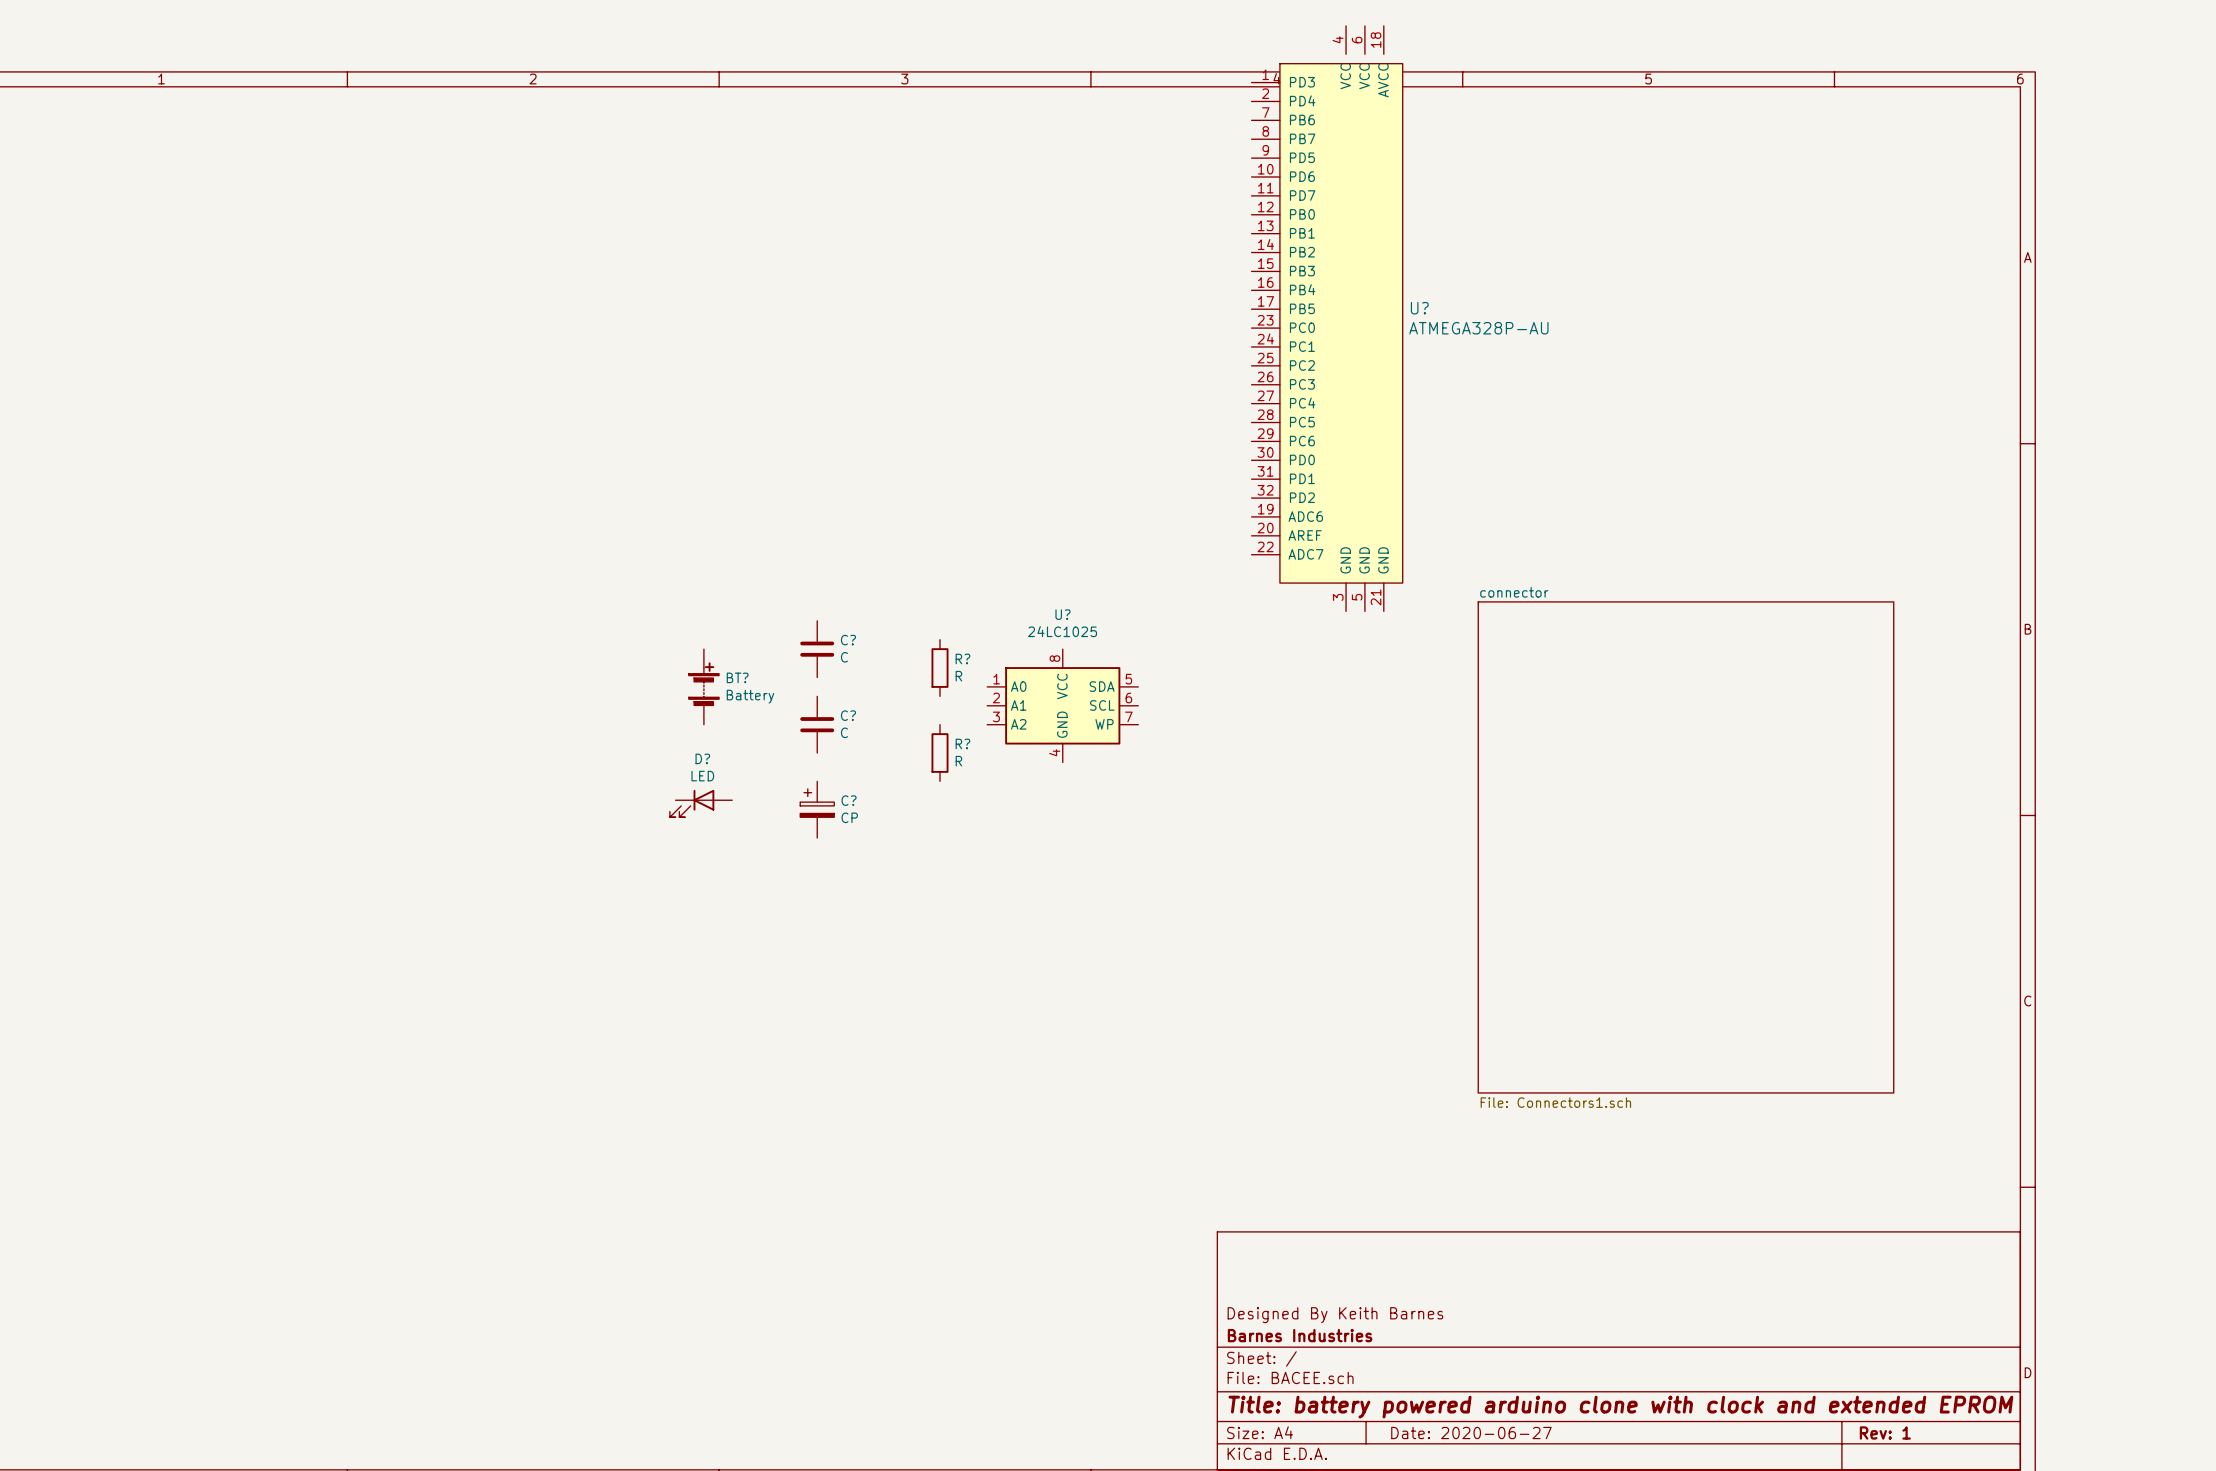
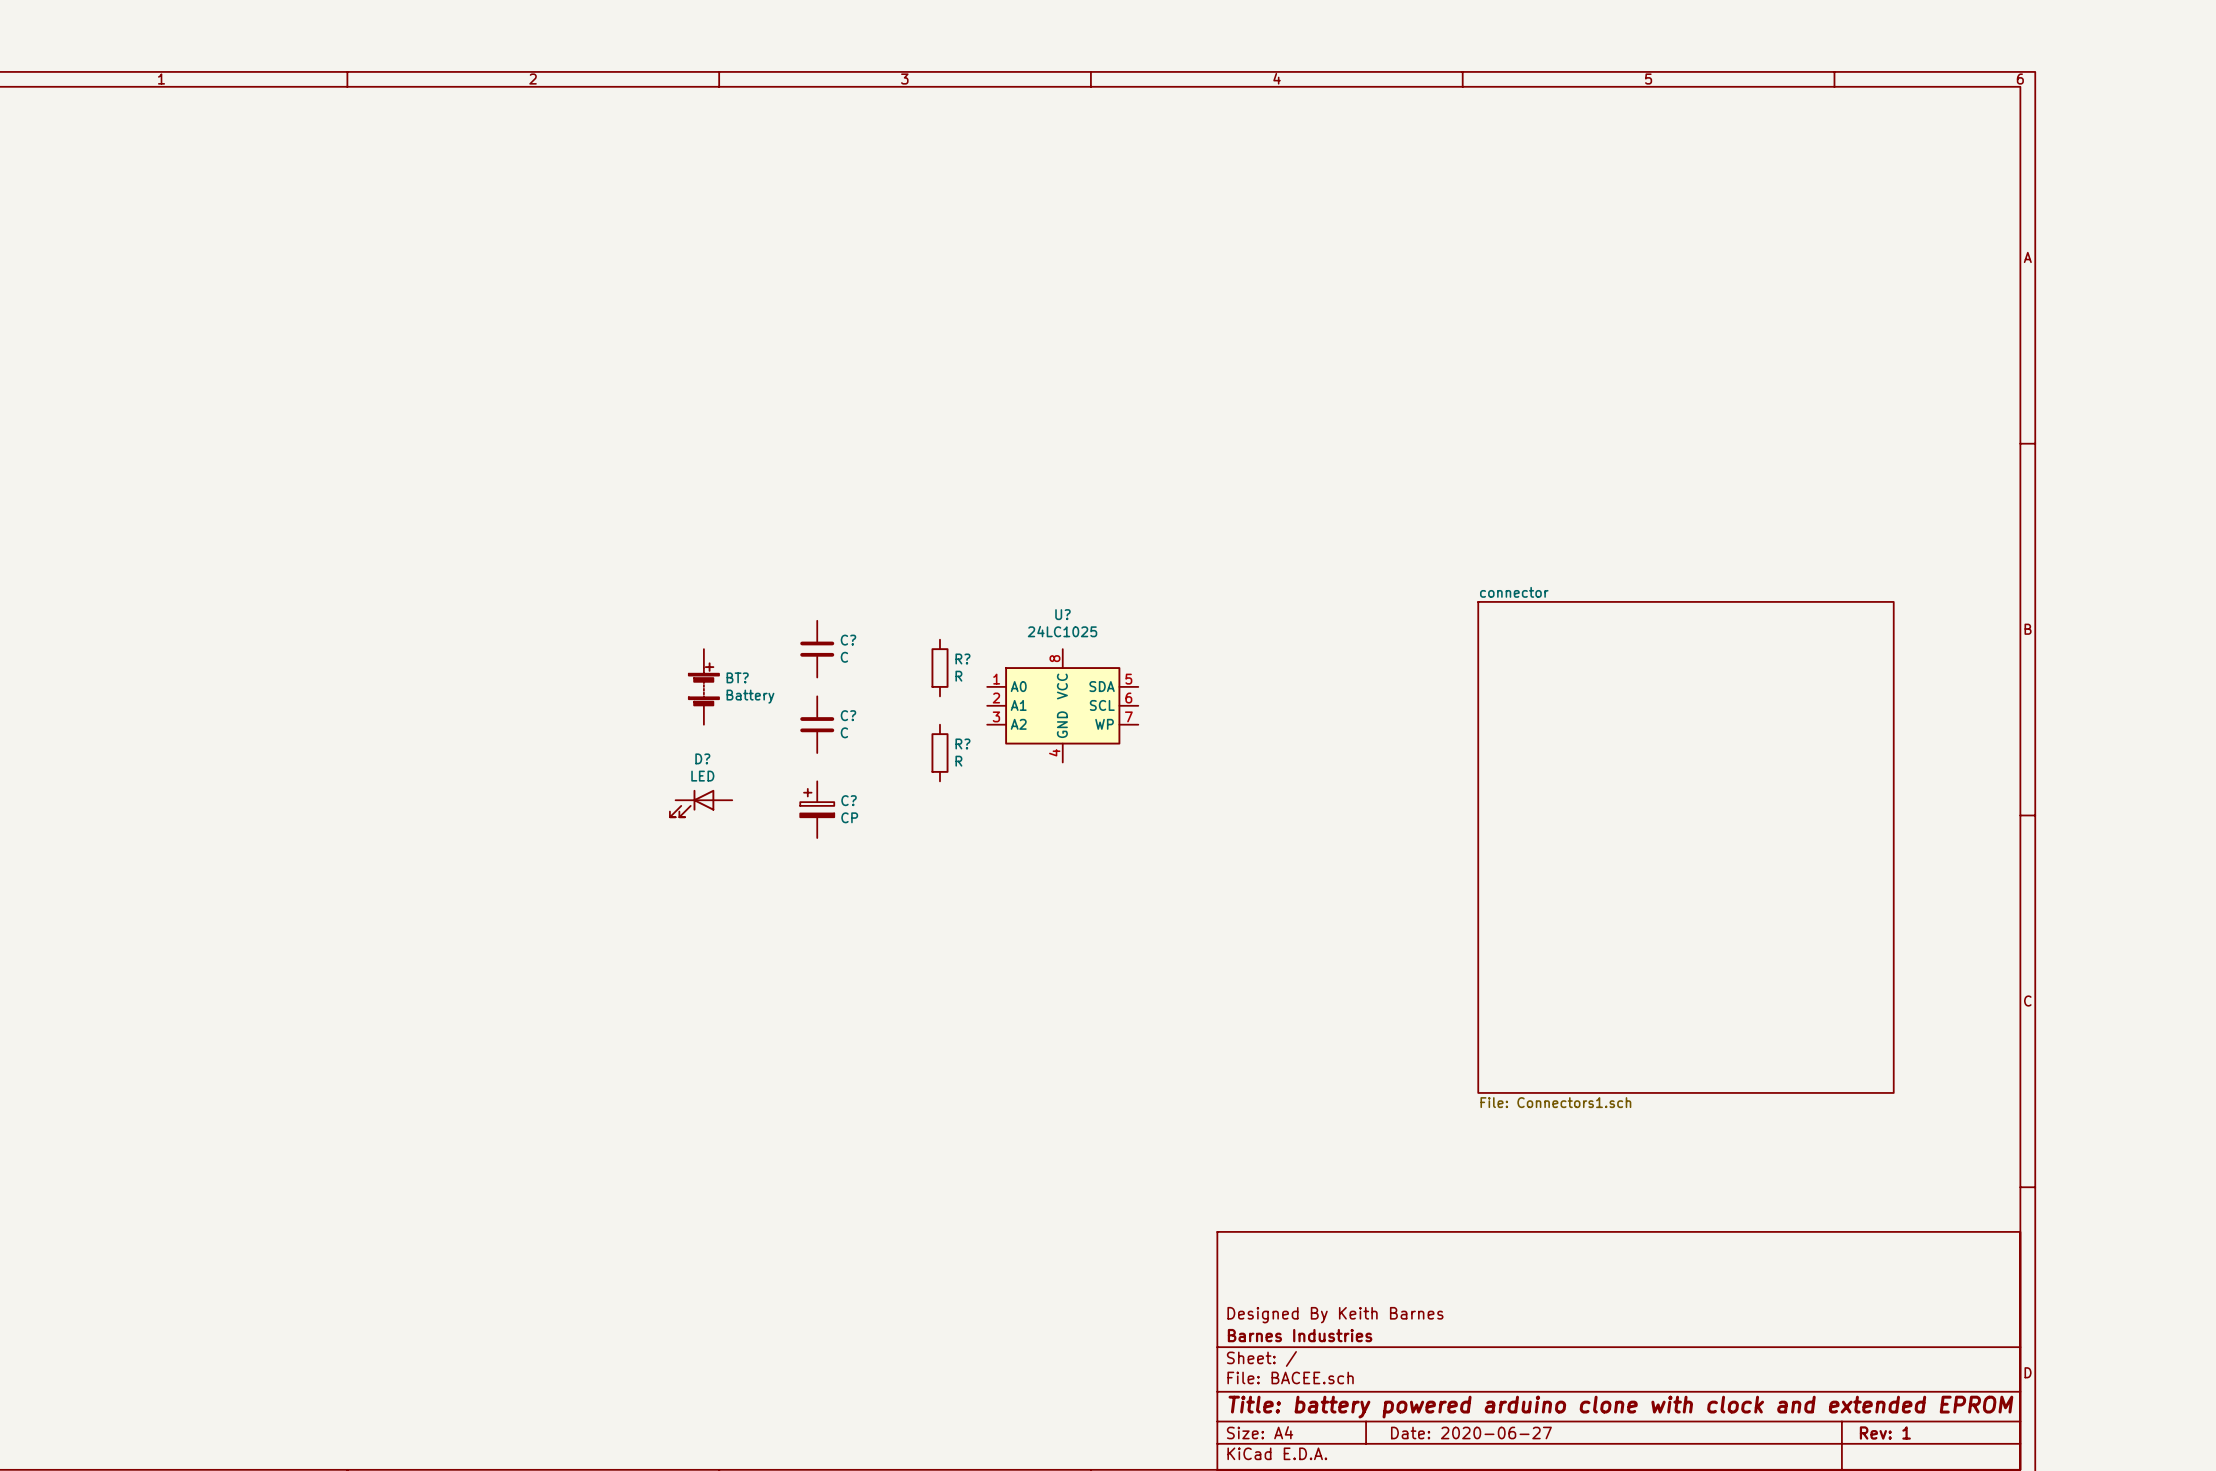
U?: ATMEGA328P-AU (1327, 318) -> none

